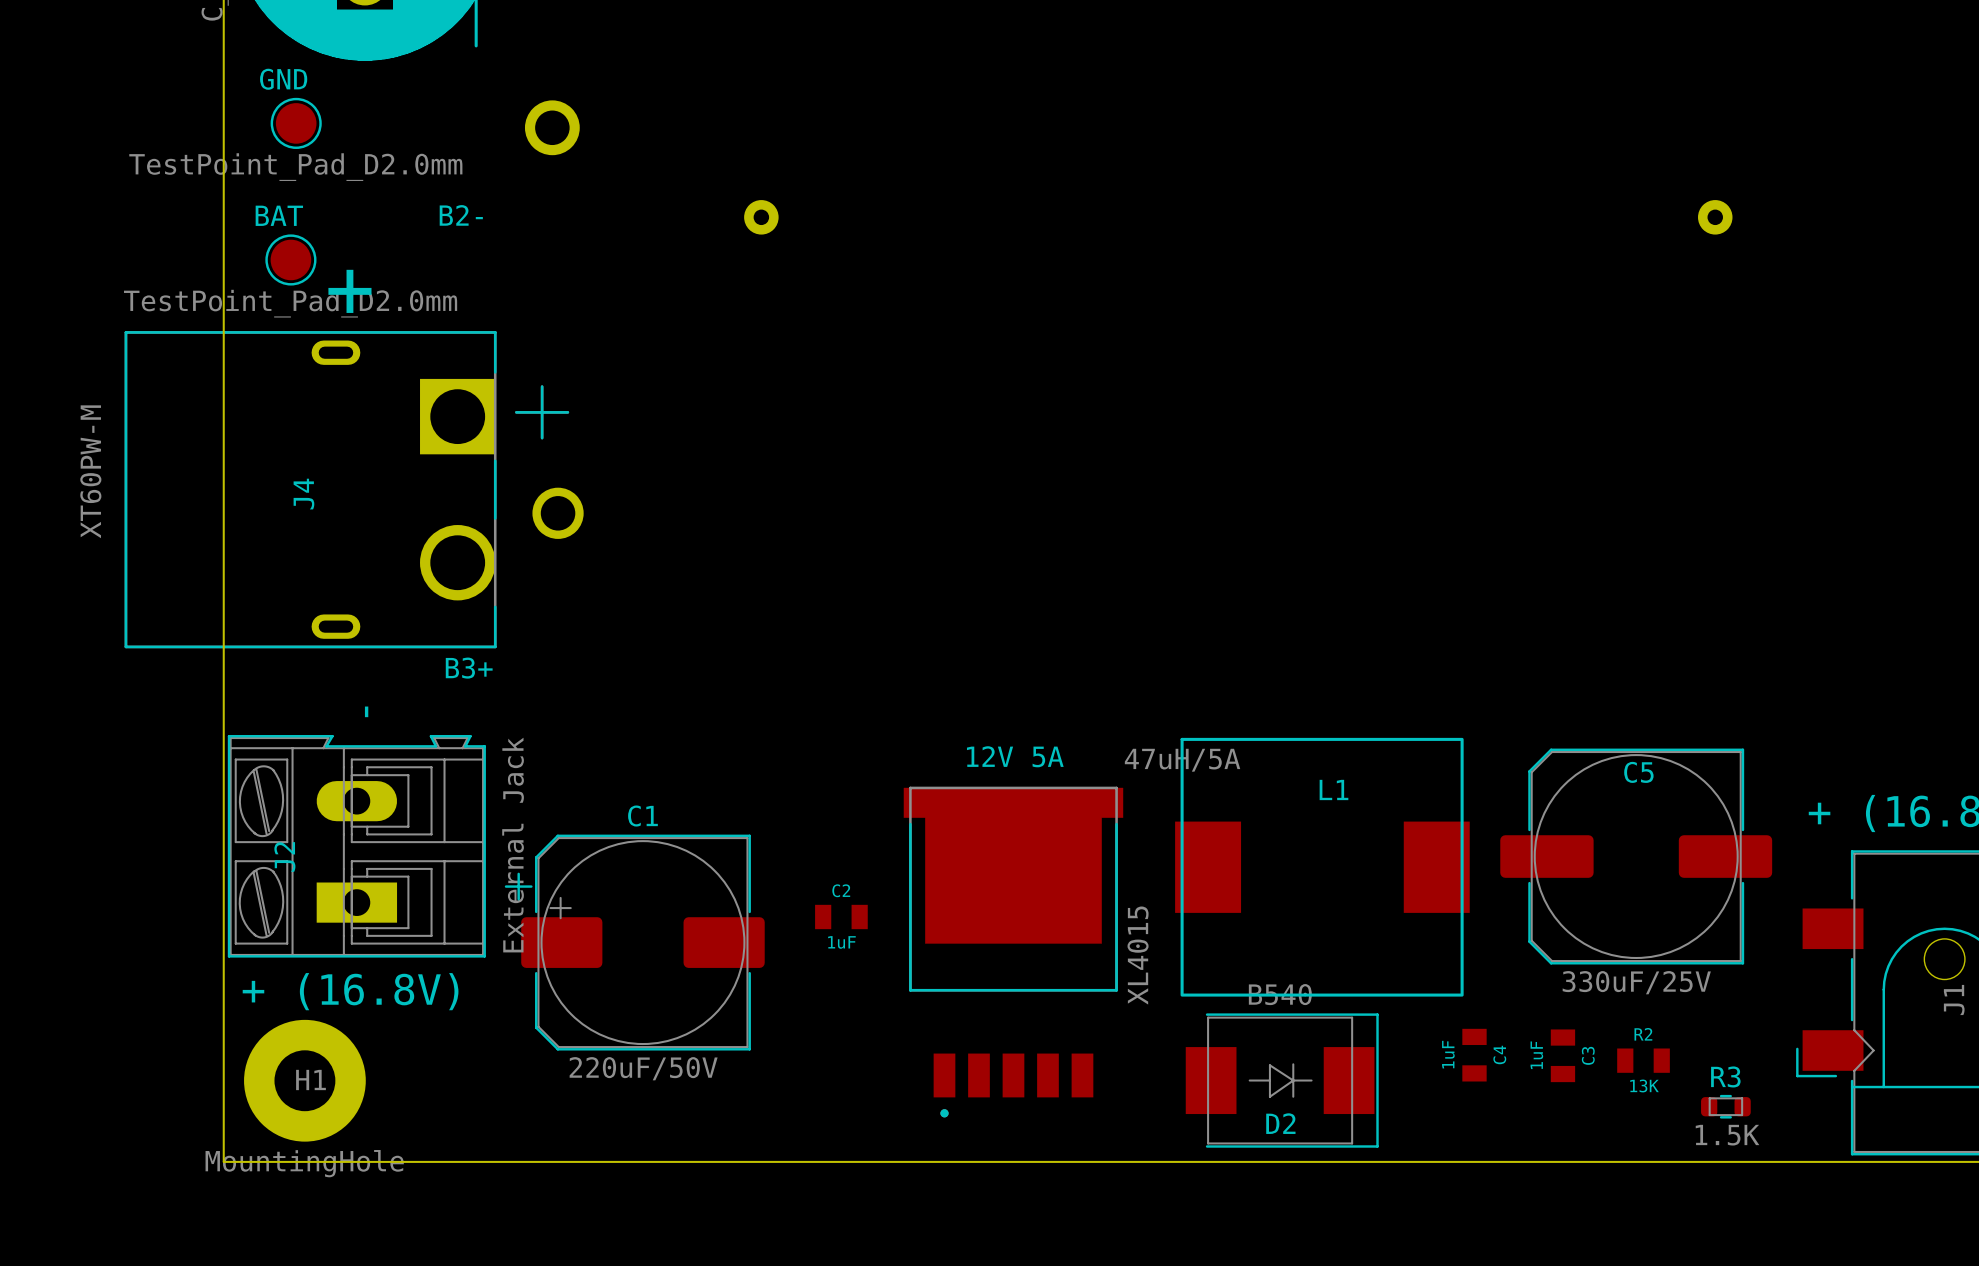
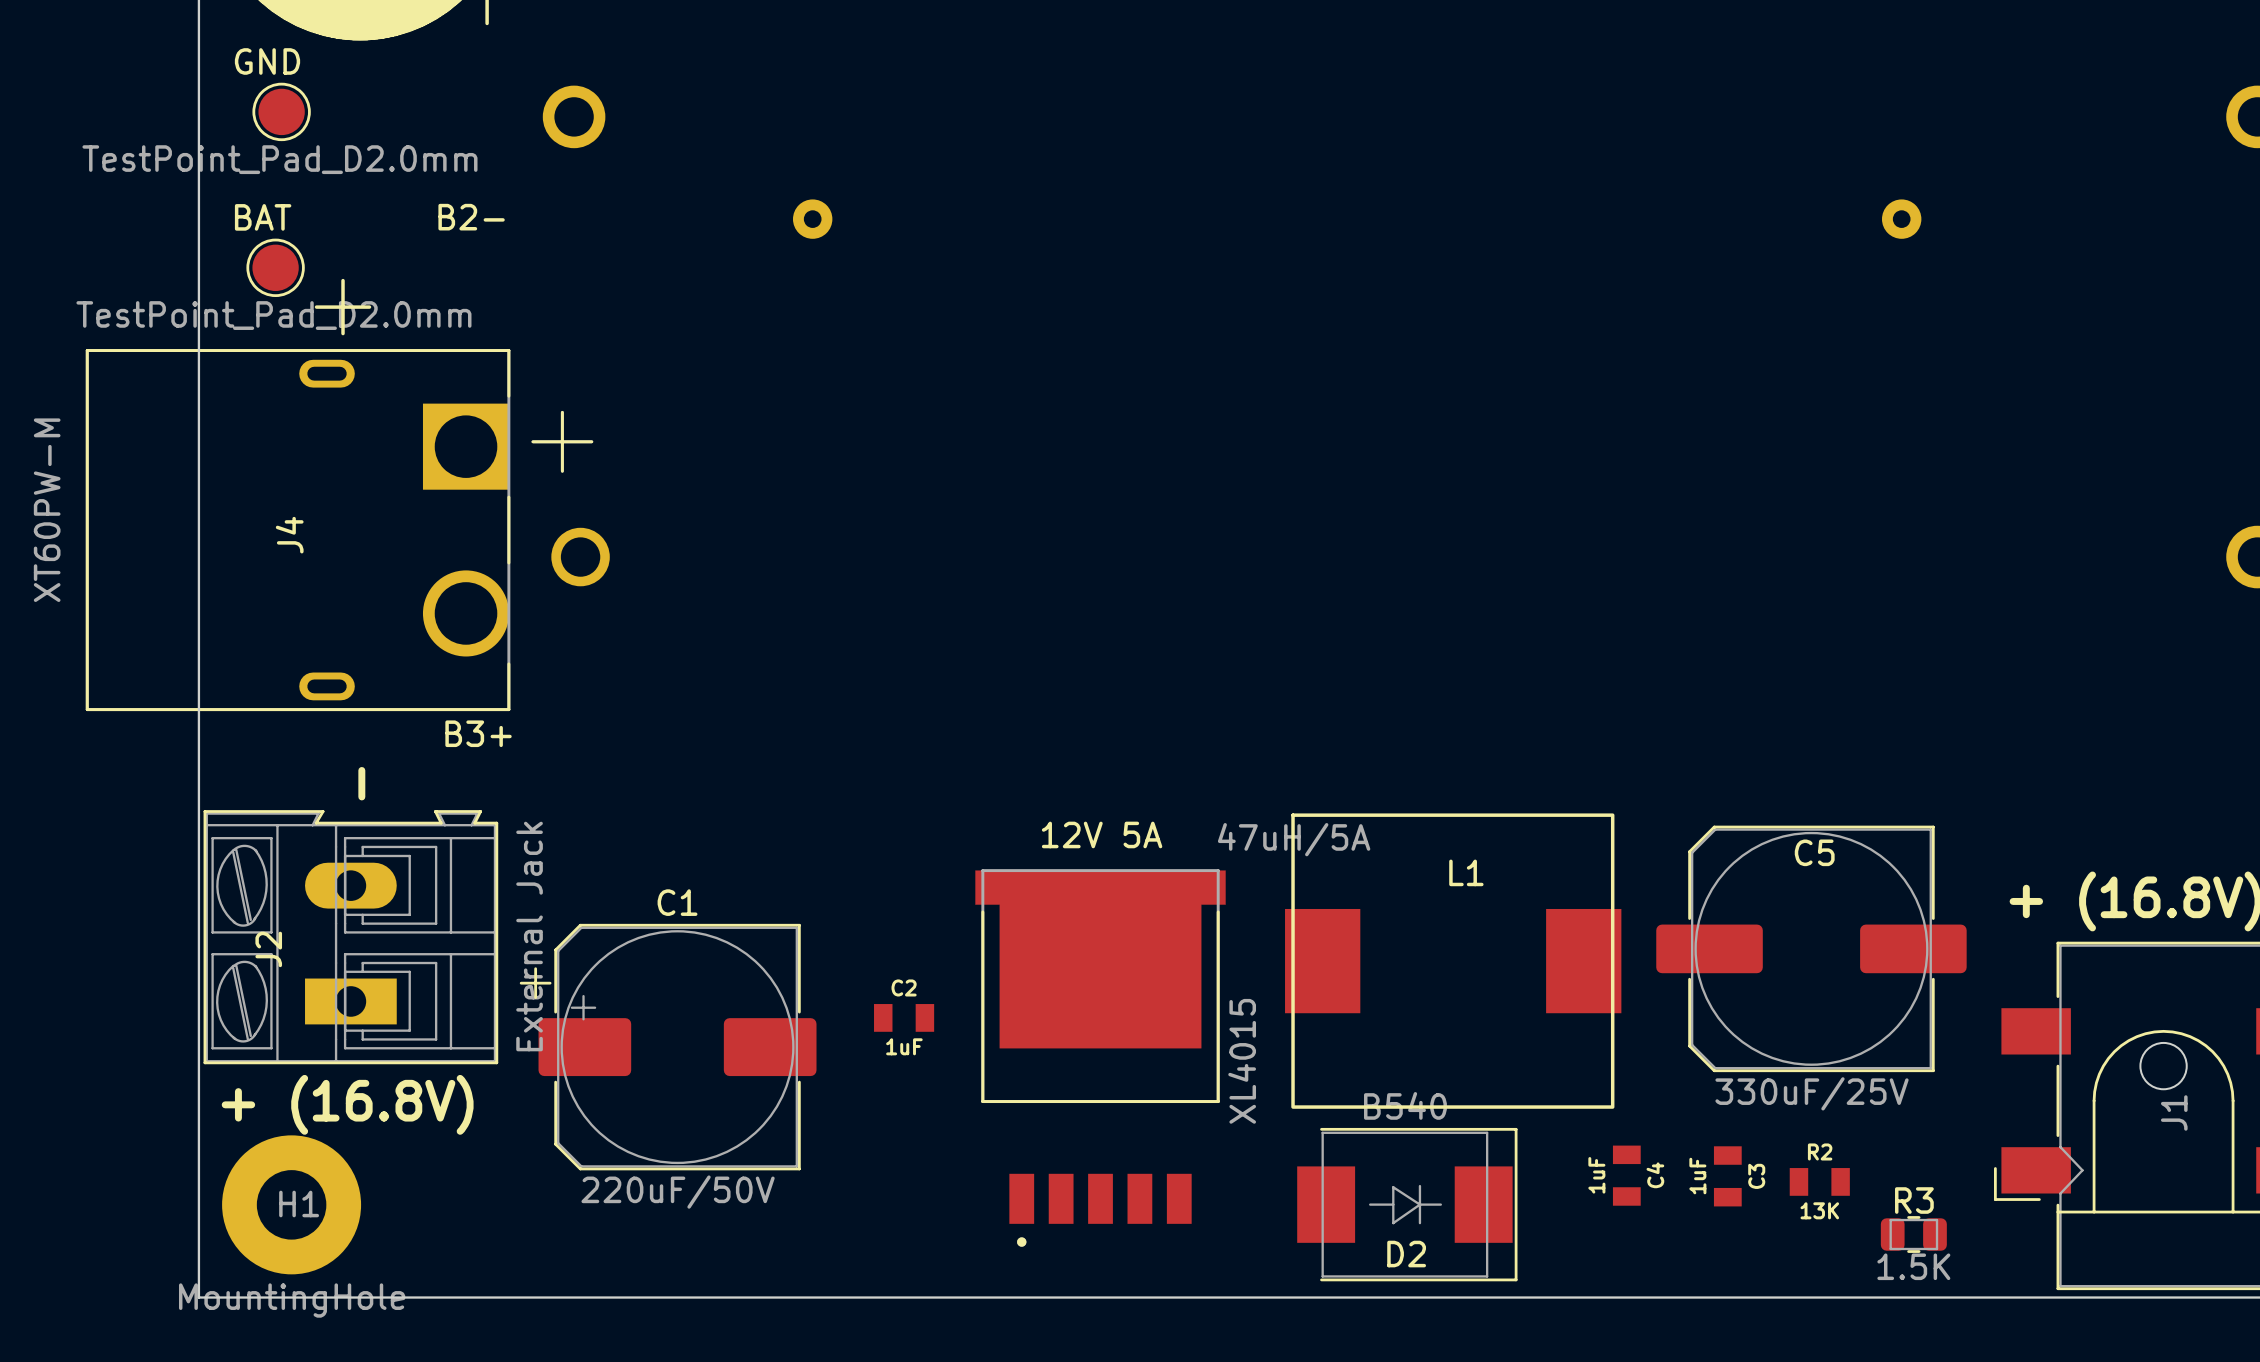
R3 footprint: [1701, 1094, 1751, 1119] -> [1880, 1216, 1947, 1253]

